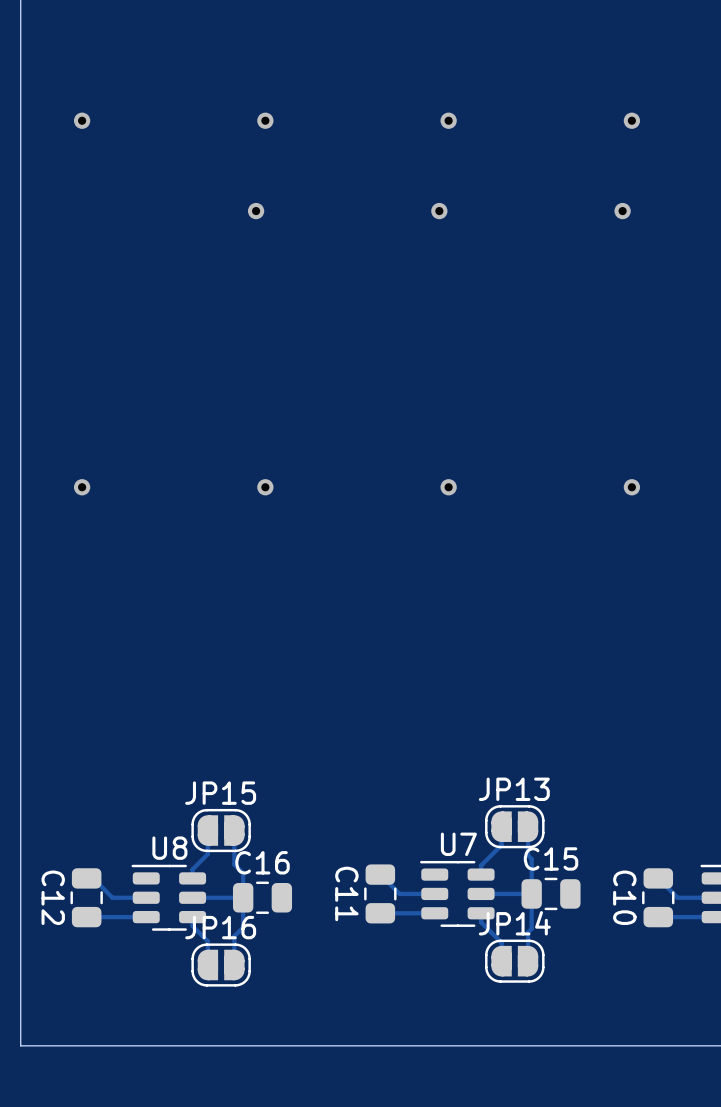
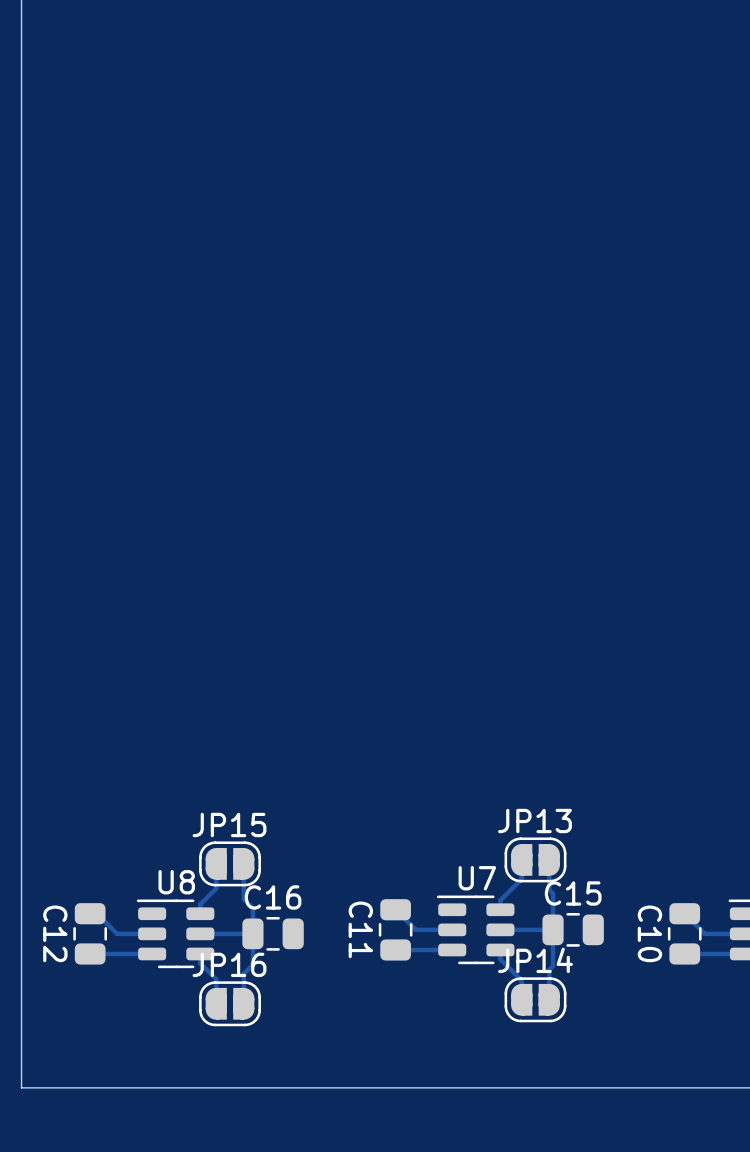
via: (82, 120) -> none
via: (265, 120) -> none
via: (448, 120) -> none
via: (631, 120) -> none
via: (256, 211) -> none
via: (439, 211) -> none
via: (622, 211) -> none
via: (82, 487) -> none
via: (265, 487) -> none
via: (448, 487) -> none
via: (631, 487) -> none

